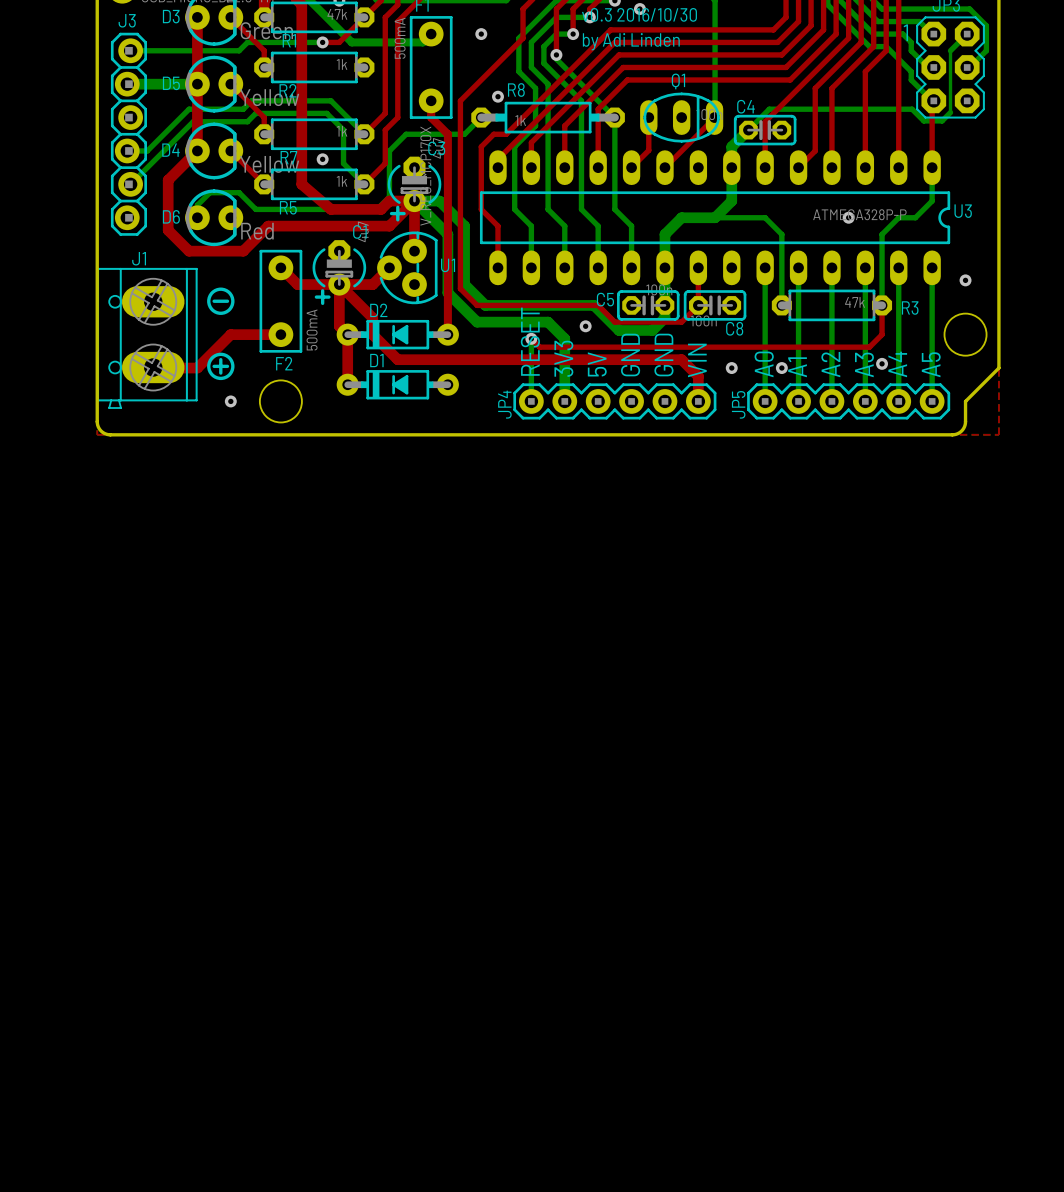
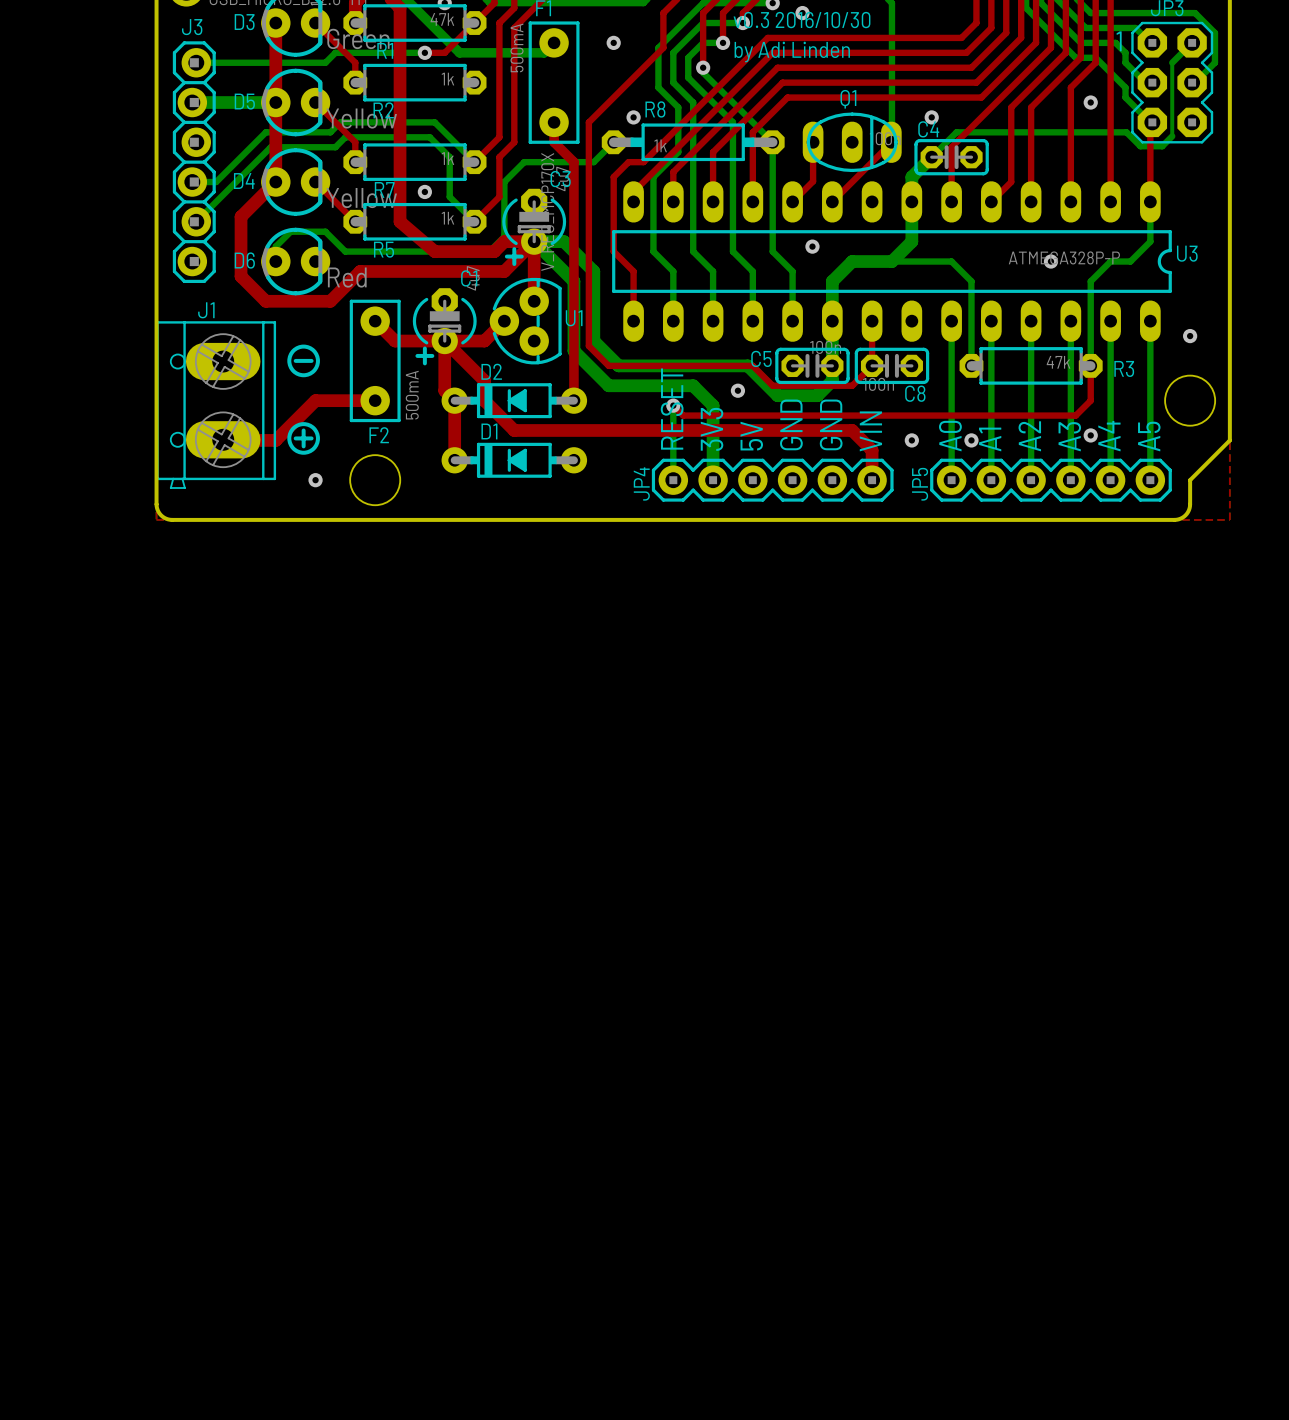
via: none -> (1090, 102)
via: none -> (931, 117)
via: none -> (812, 246)

